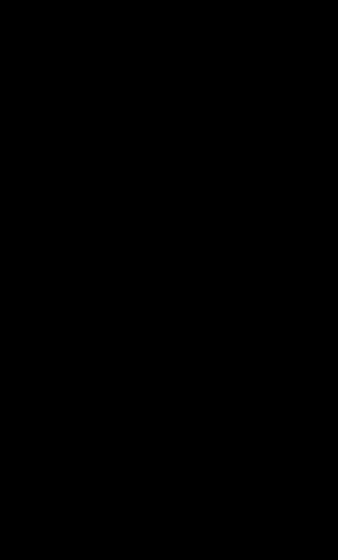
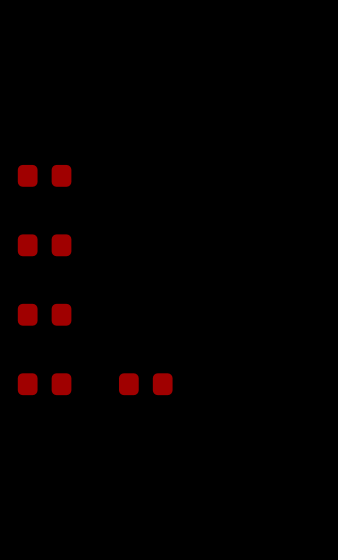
part: none -> (44, 175)
part: none -> (44, 245)
part: none -> (44, 314)
part: none -> (44, 384)
part: none -> (145, 384)

